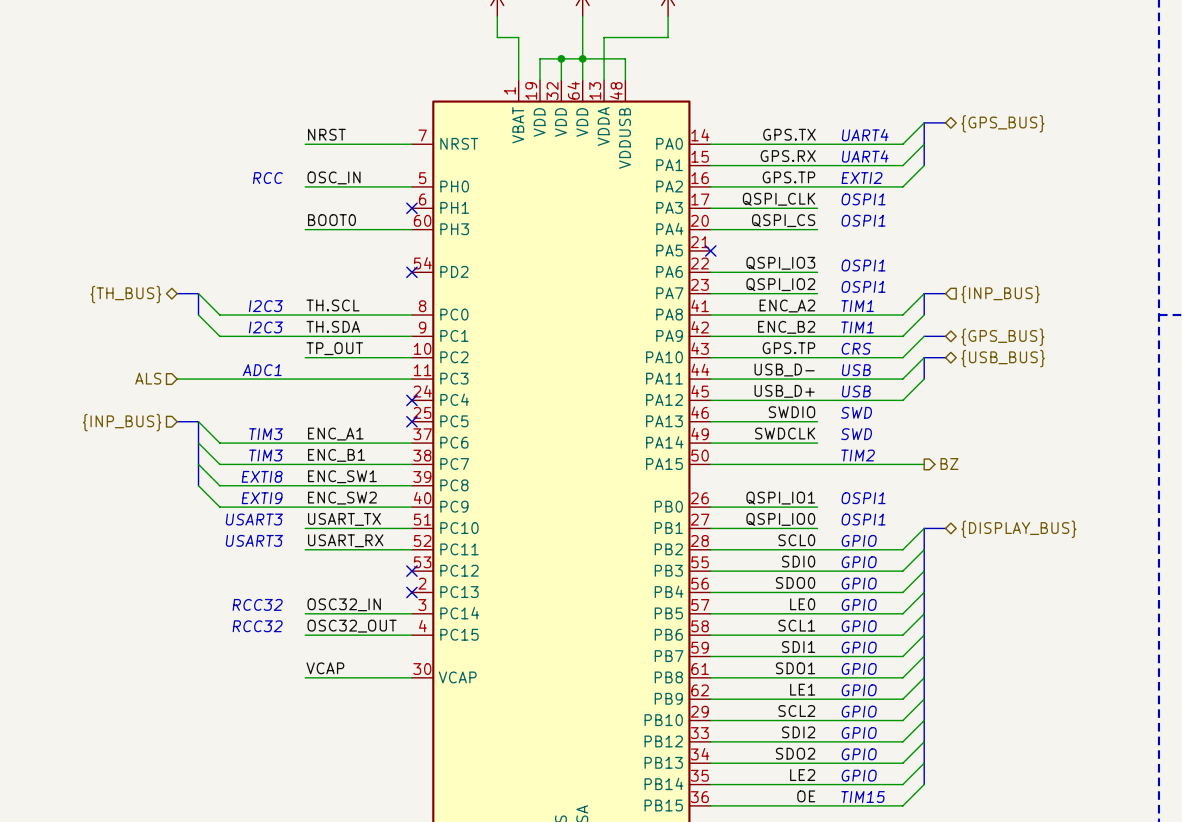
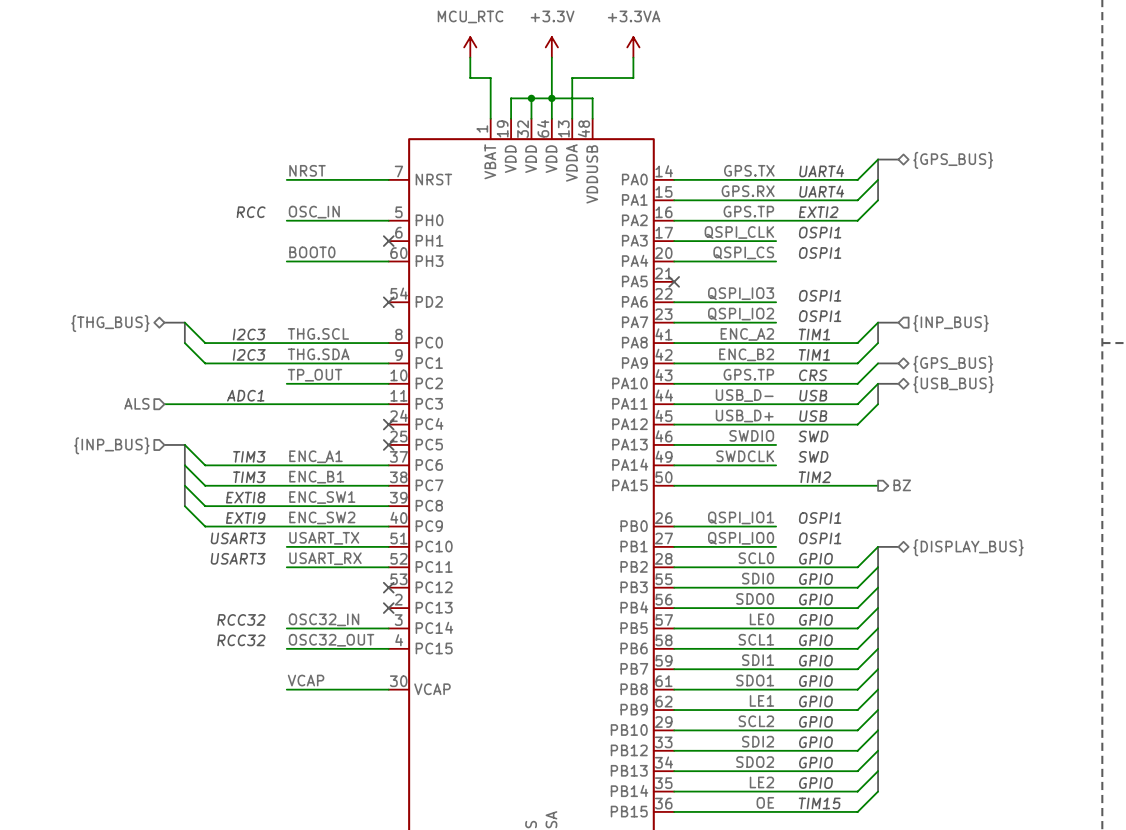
hierarchical label: {TH_BUS} (125, 294) -> {THG_BUS} (110, 323)
label: TH.SCL (333, 305) -> THG.SCL (318, 333)
label: TH.SDA (333, 326) -> THG.SDA (318, 354)

